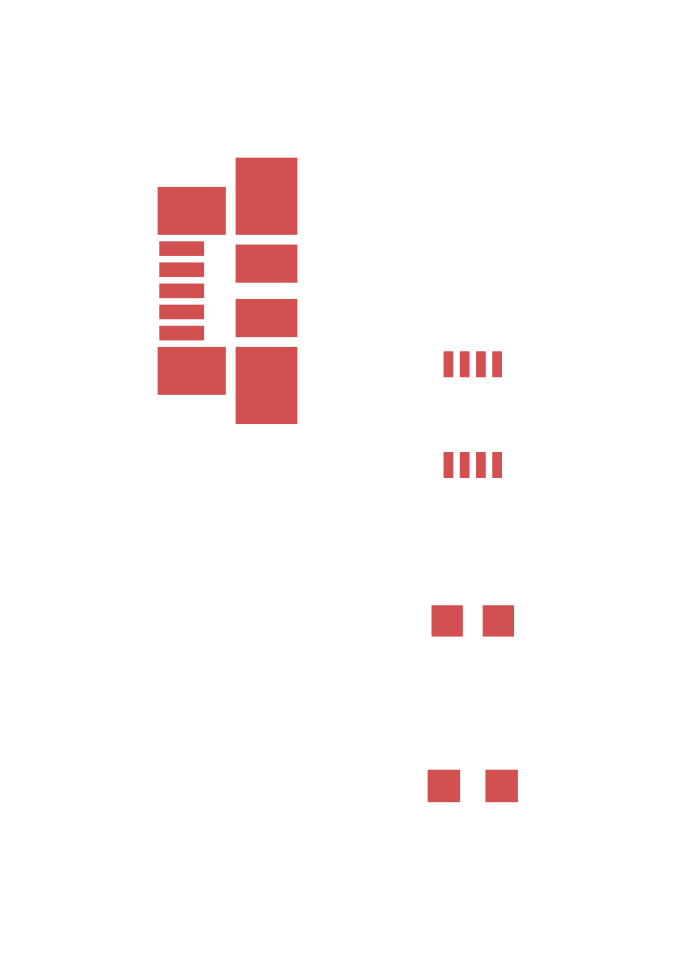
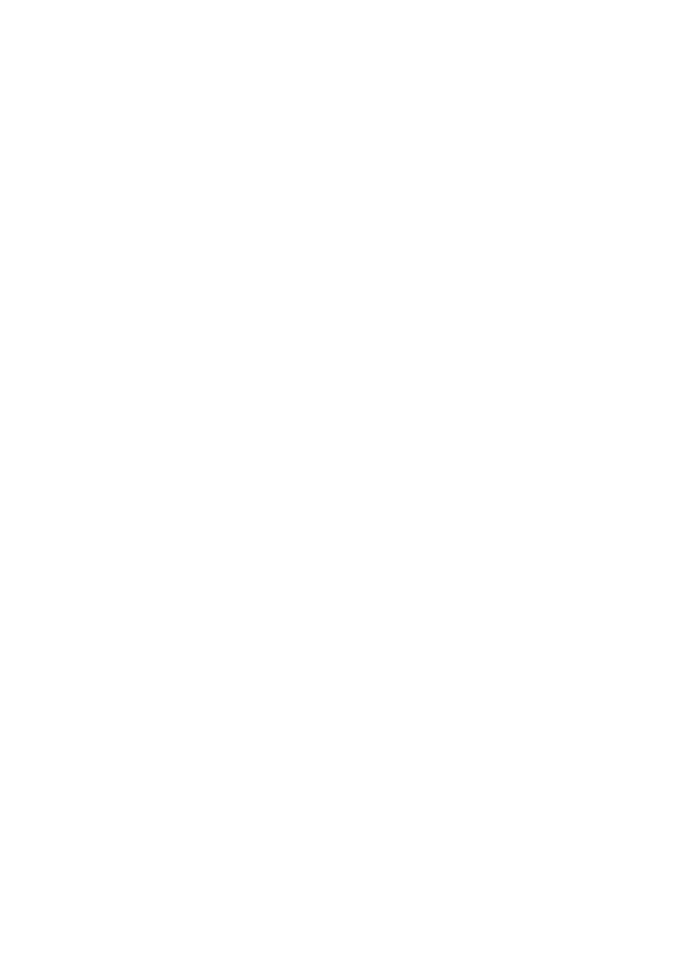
part: (227, 290) -> none
part: (472, 414) -> none
part: (472, 620) -> none
part: (472, 785) -> none

